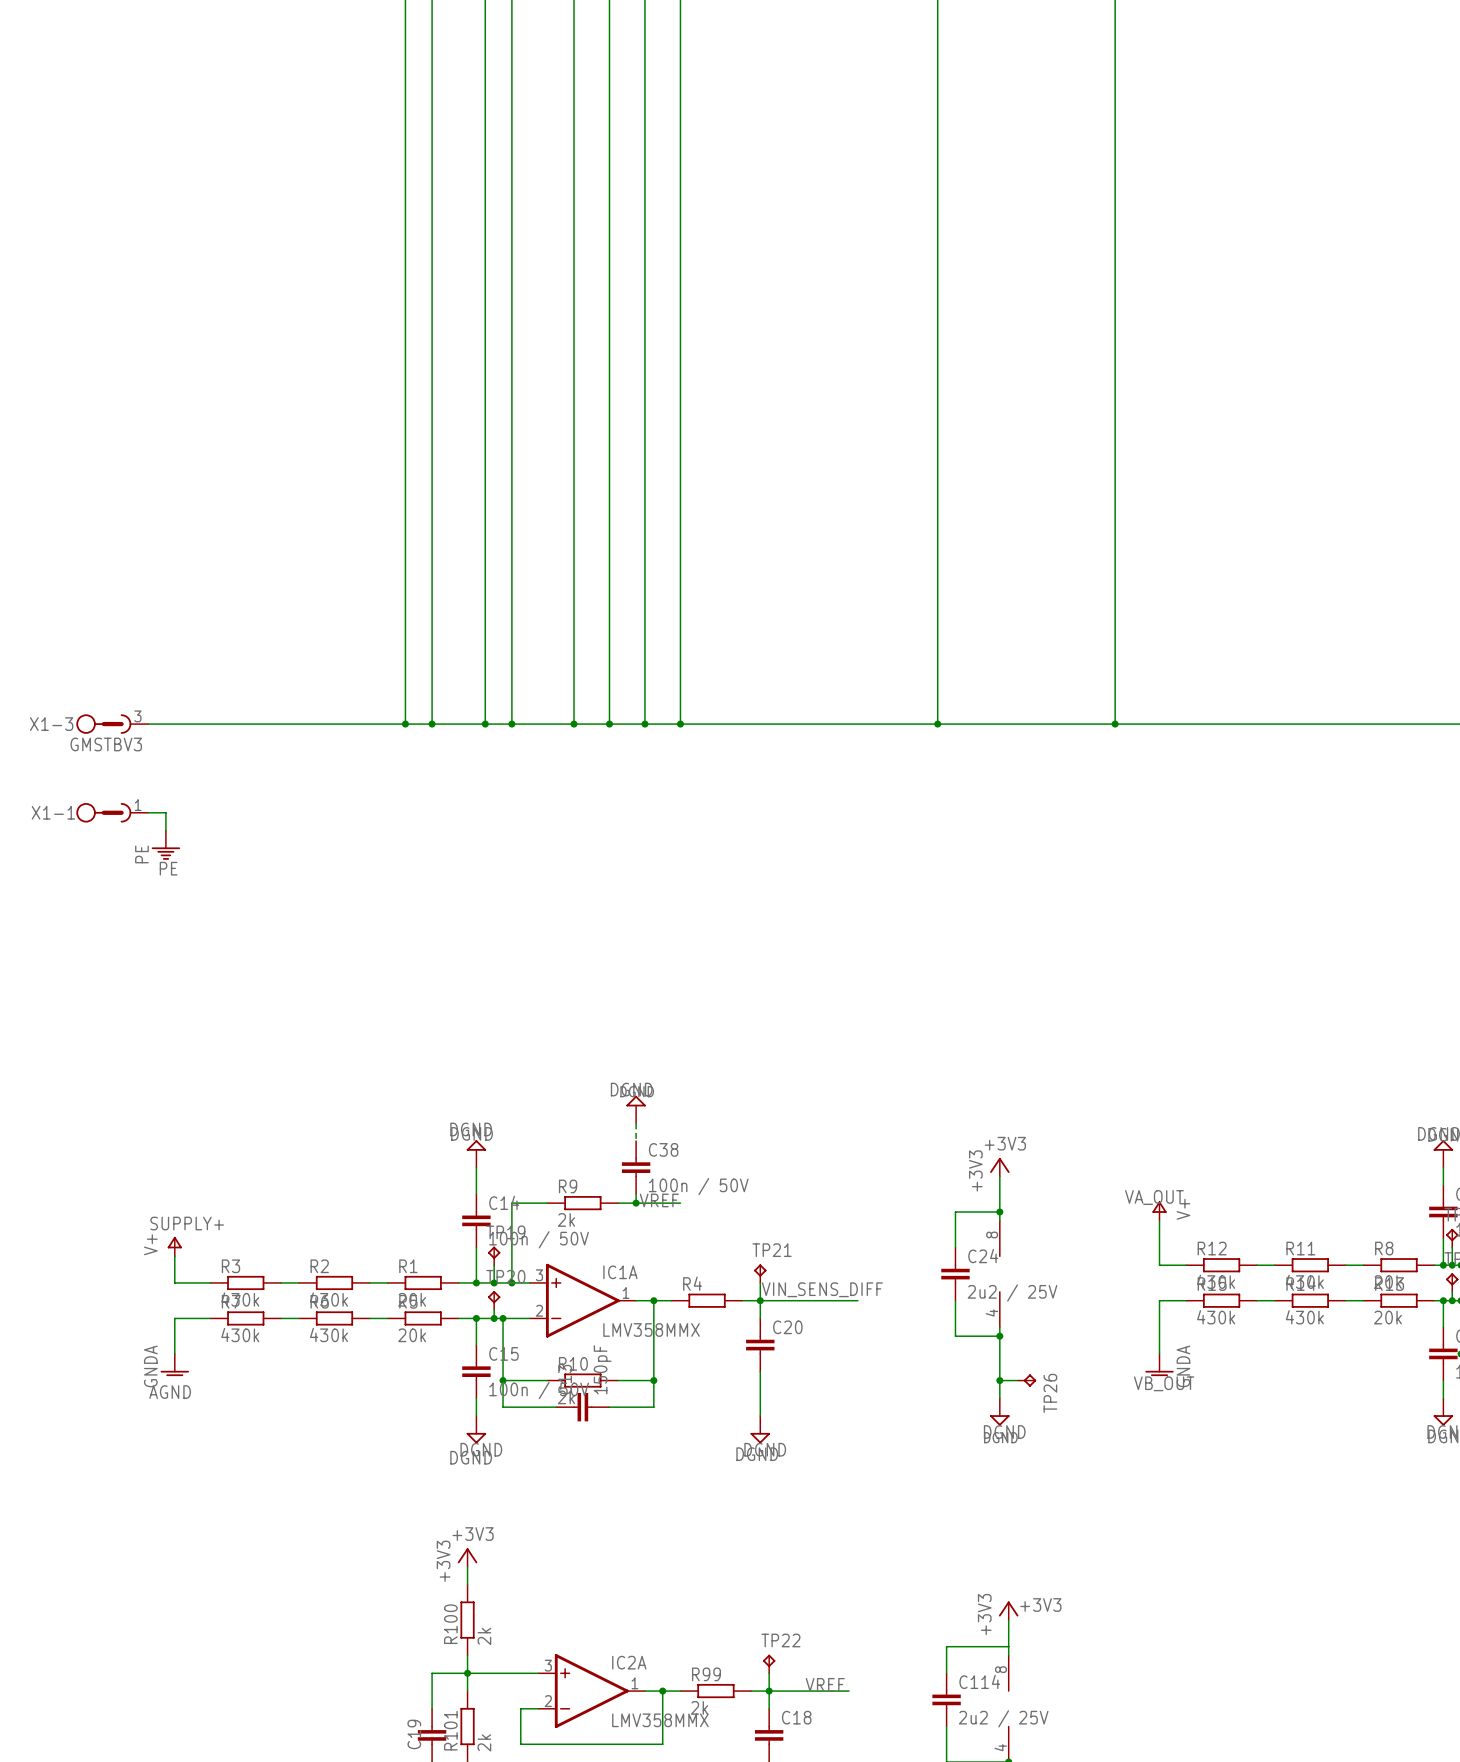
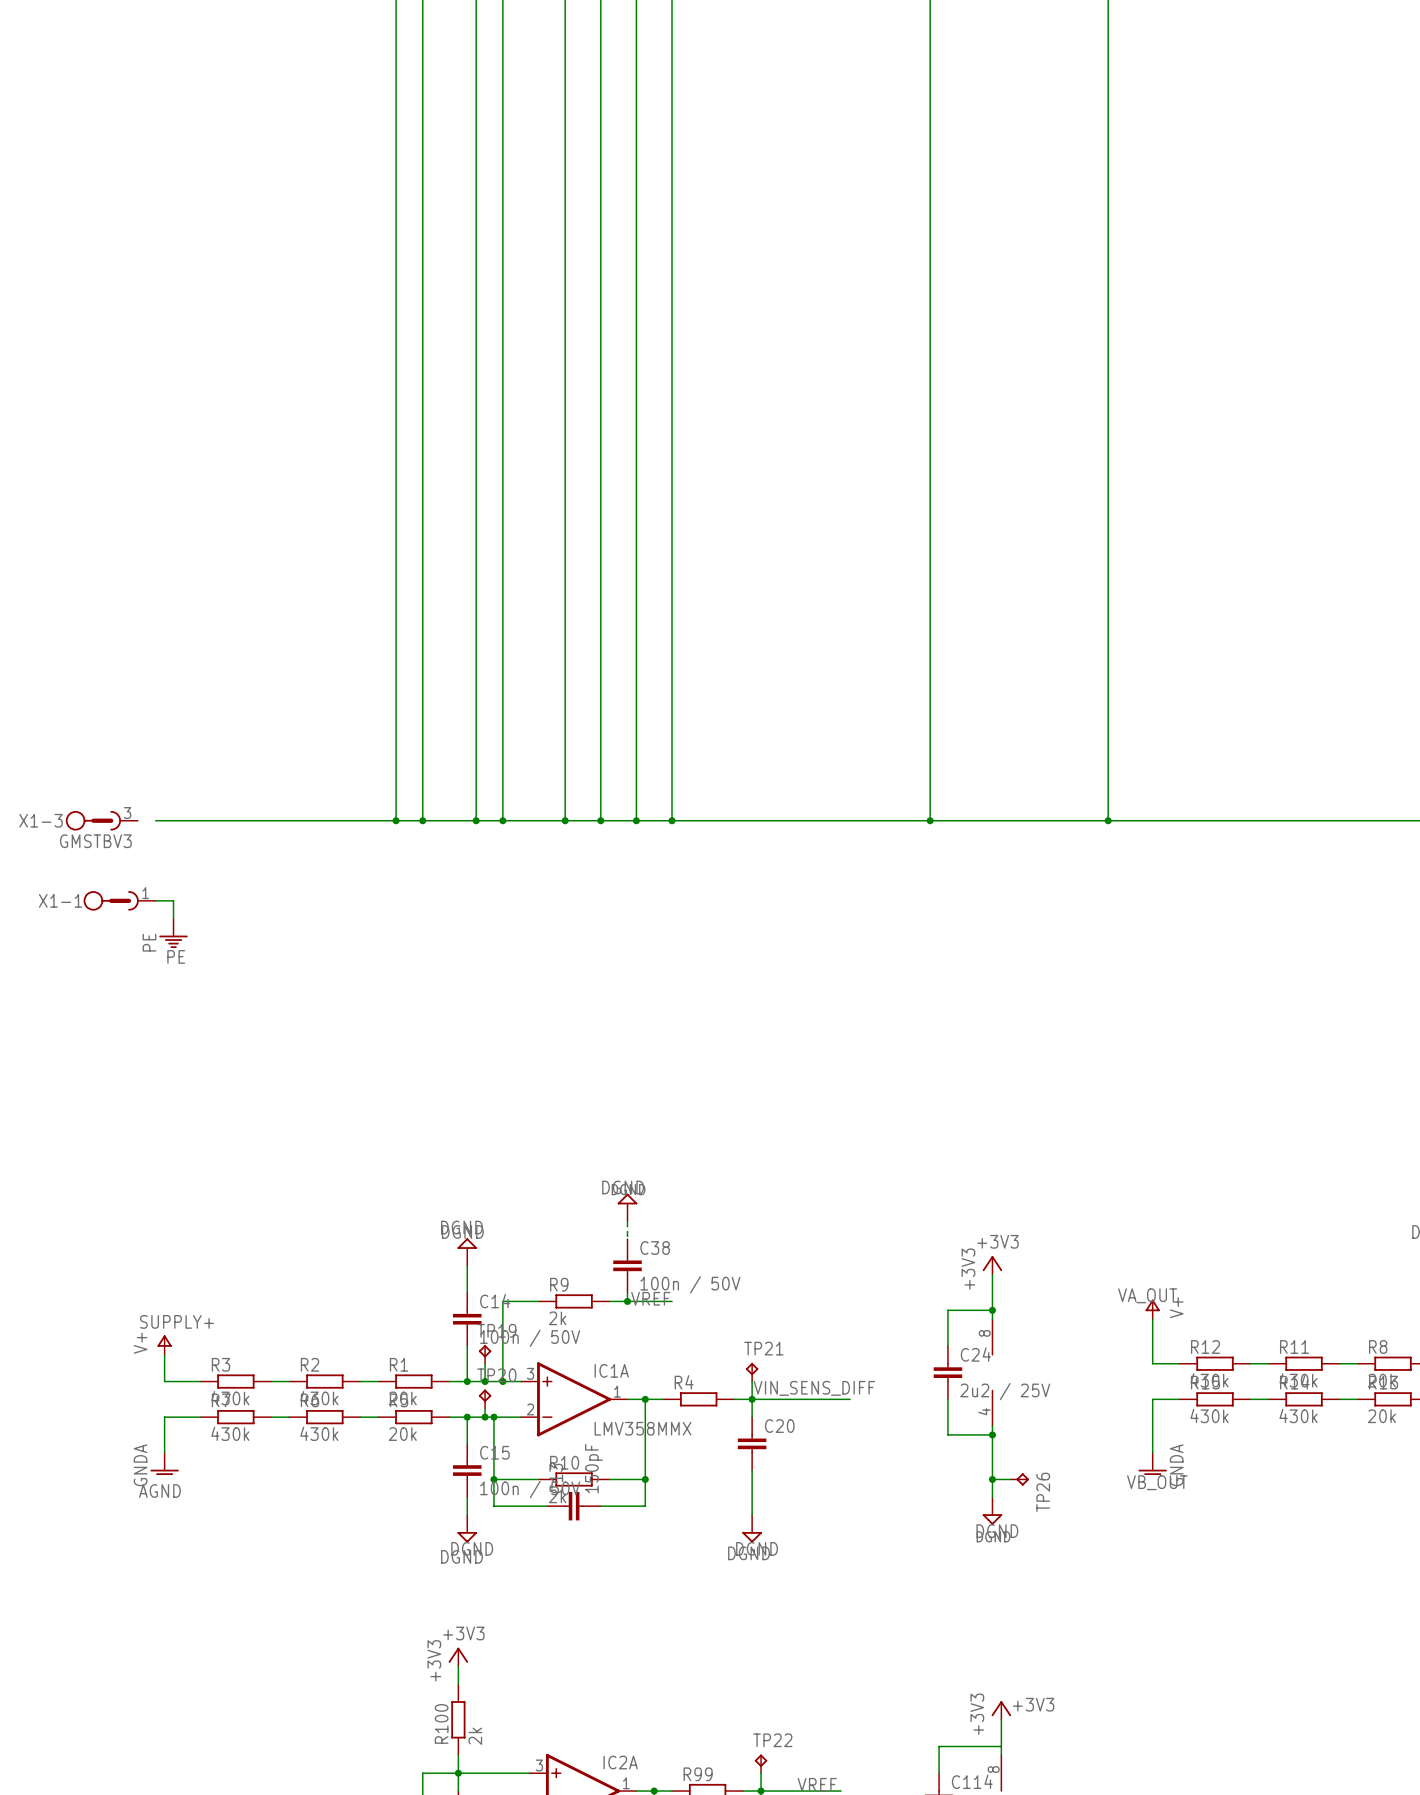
wire: (148, 724) (165, 724) -> none
X1-1 position: (112, 812) -> (119, 900)
wire: (148, 812) (165, 812) (165, 830) -> (155, 900) (173, 900) (173, 918)
power symbol position: PE (165, 845) -> PE (173, 933)
label position: PE (168, 868) -> PE (176, 956)

